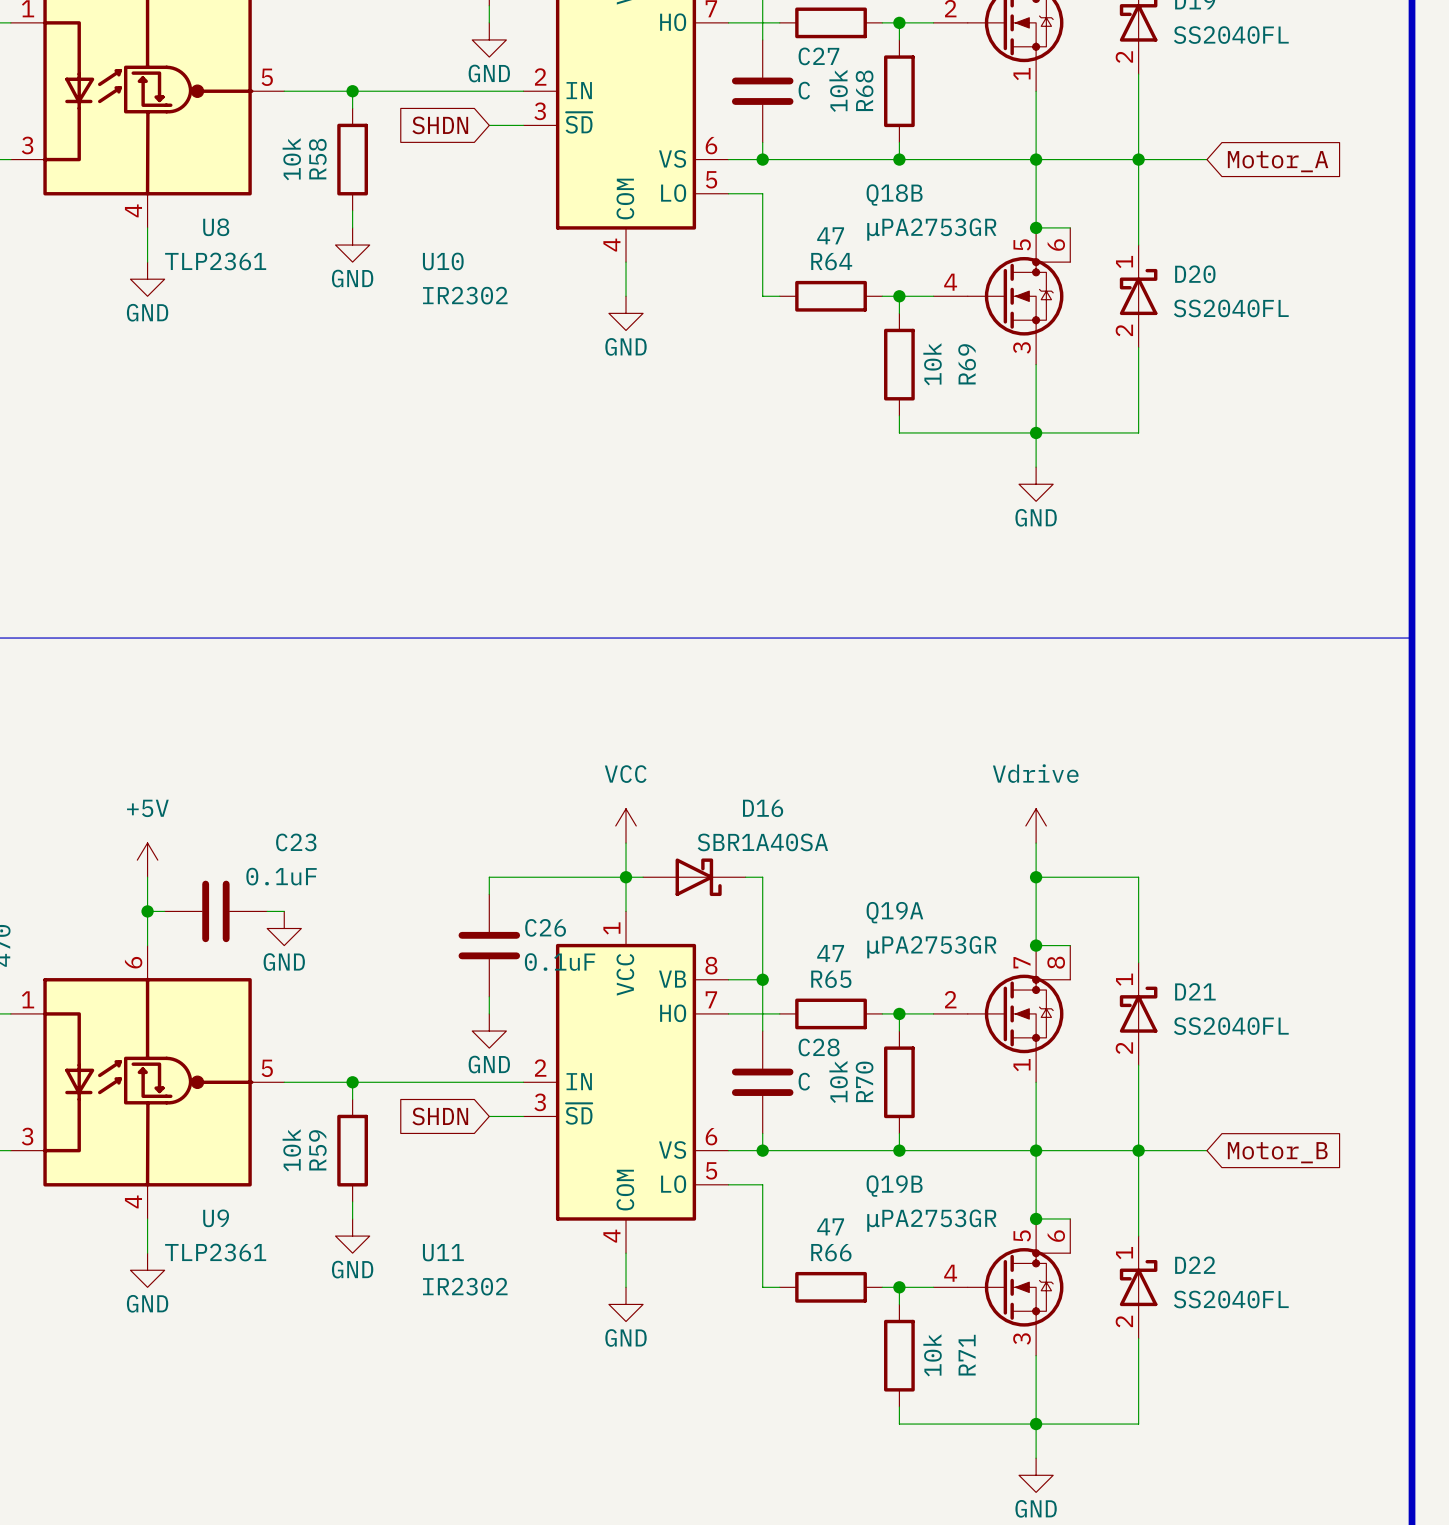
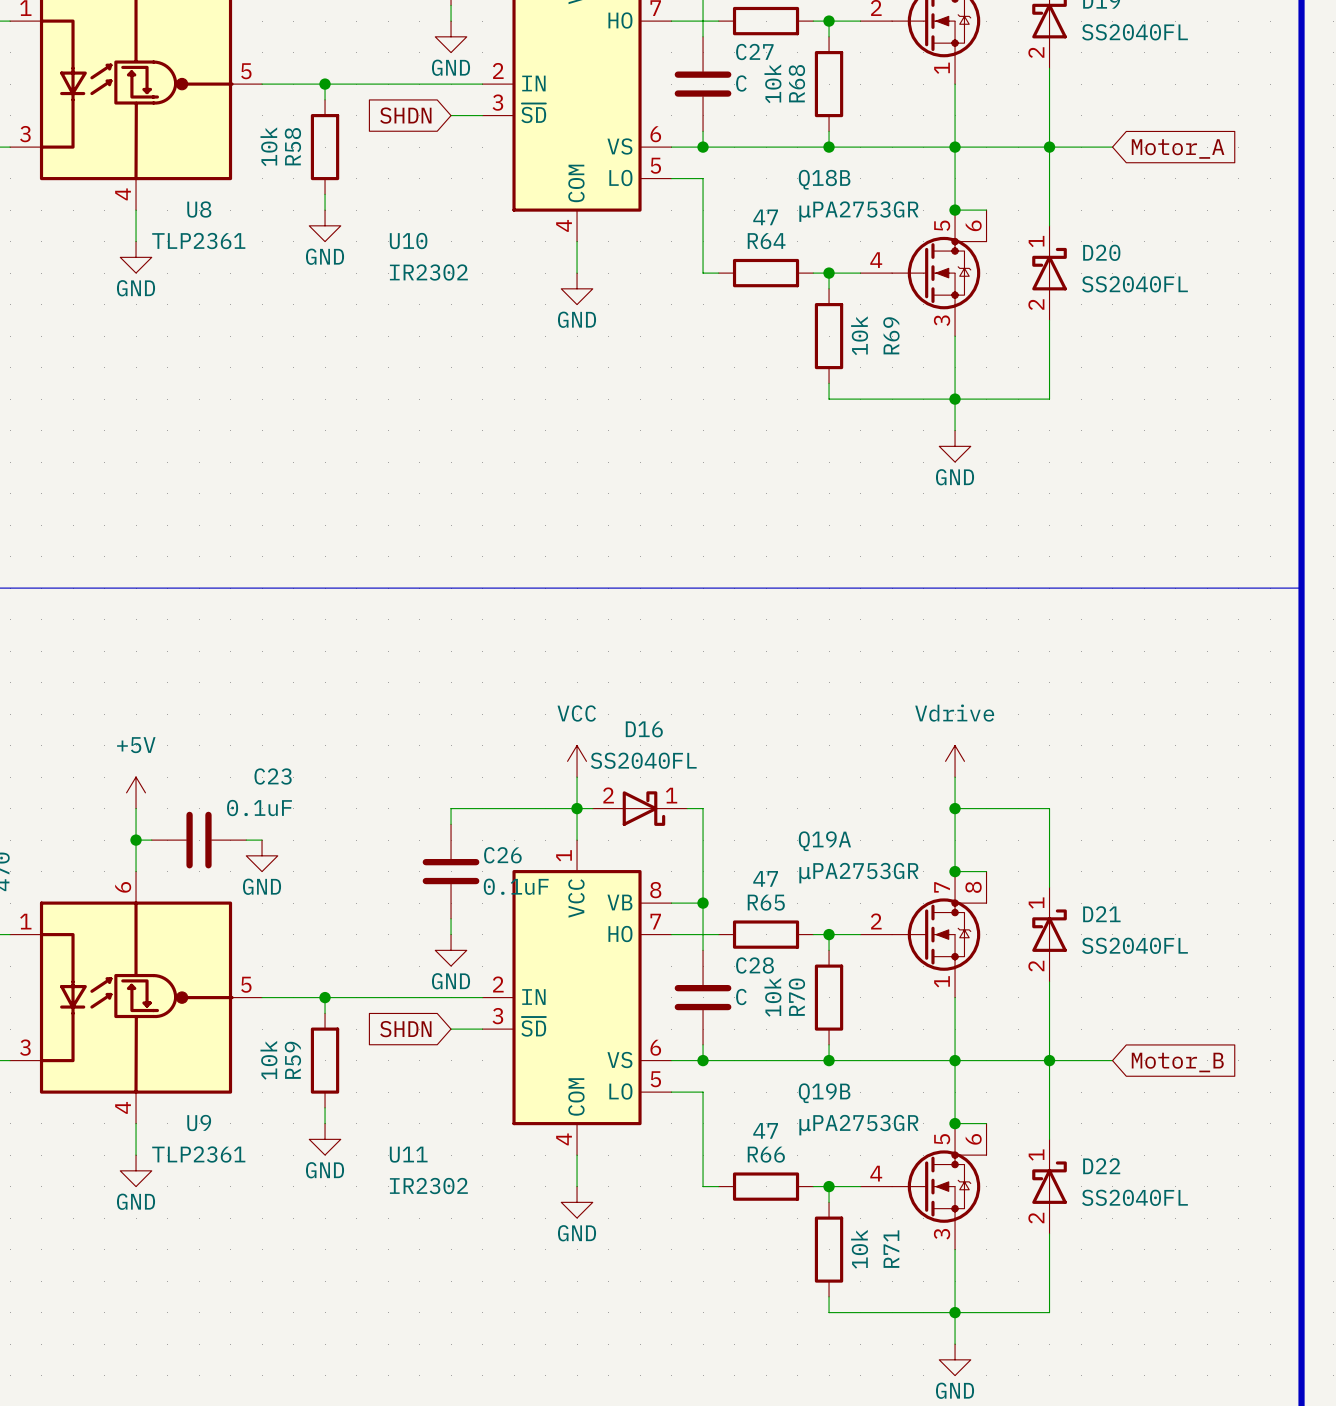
D16 name position: D16 (763, 808) -> D16 (644, 729)
D16 value: SBR1A40SA (762, 842) -> SS2040FL (643, 760)
D16 pin number: none -> 2 (608, 795)
D16 pin number: none -> 1 (671, 795)

